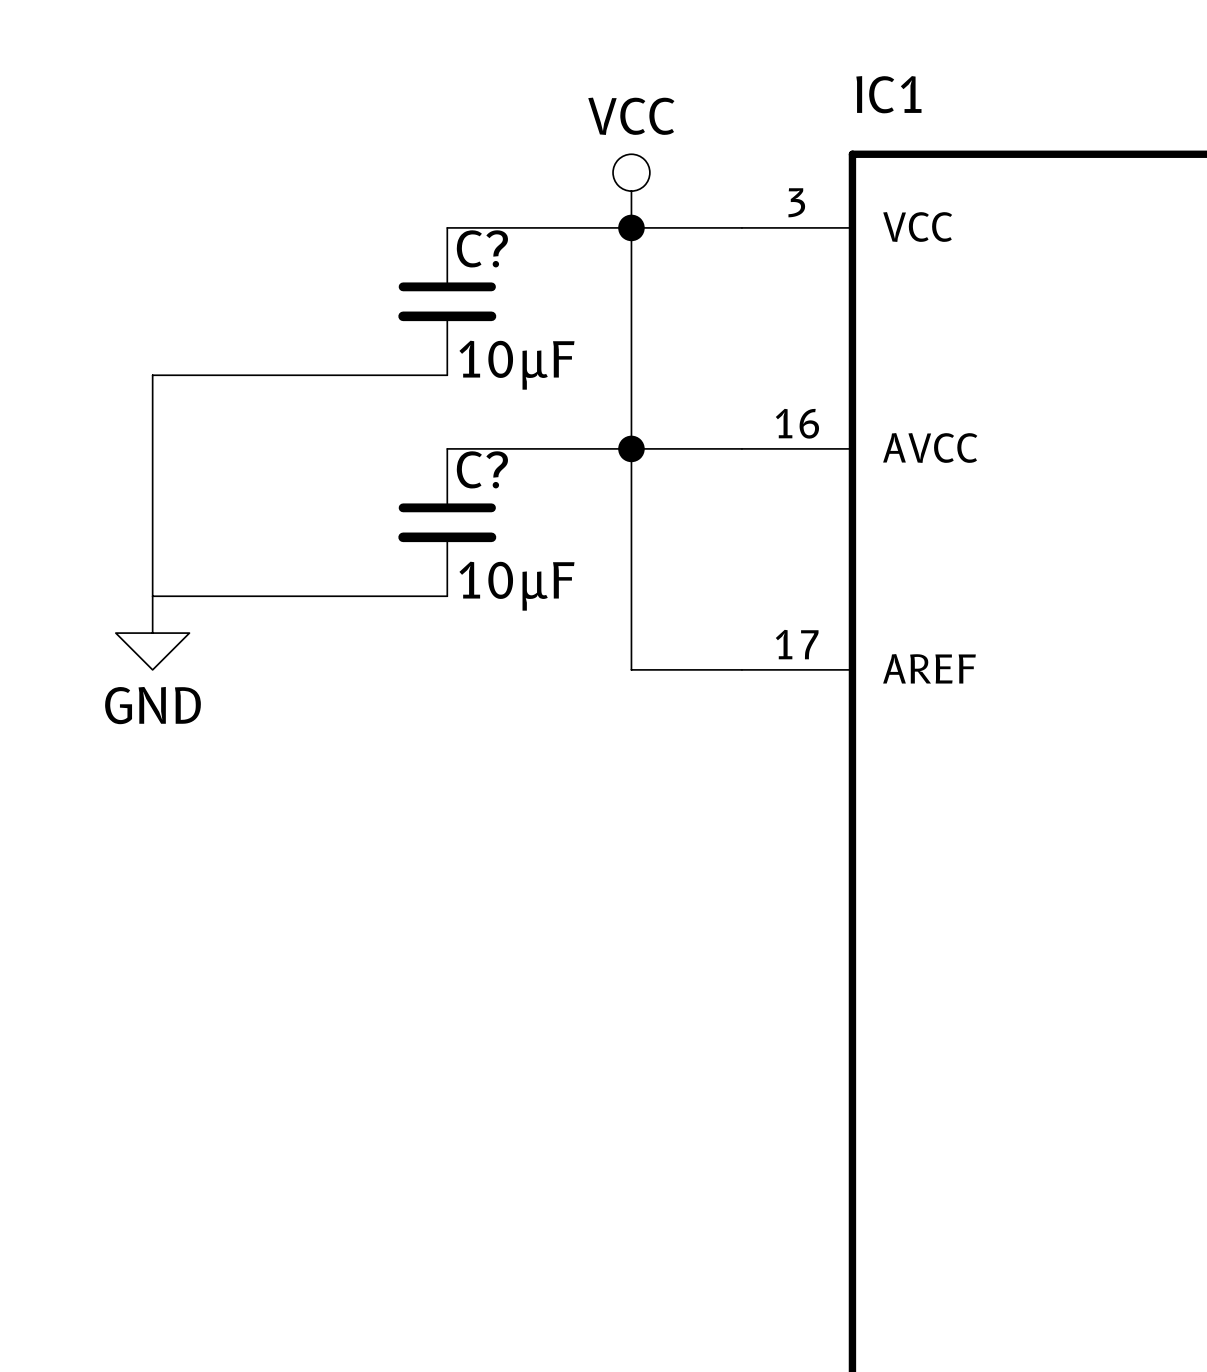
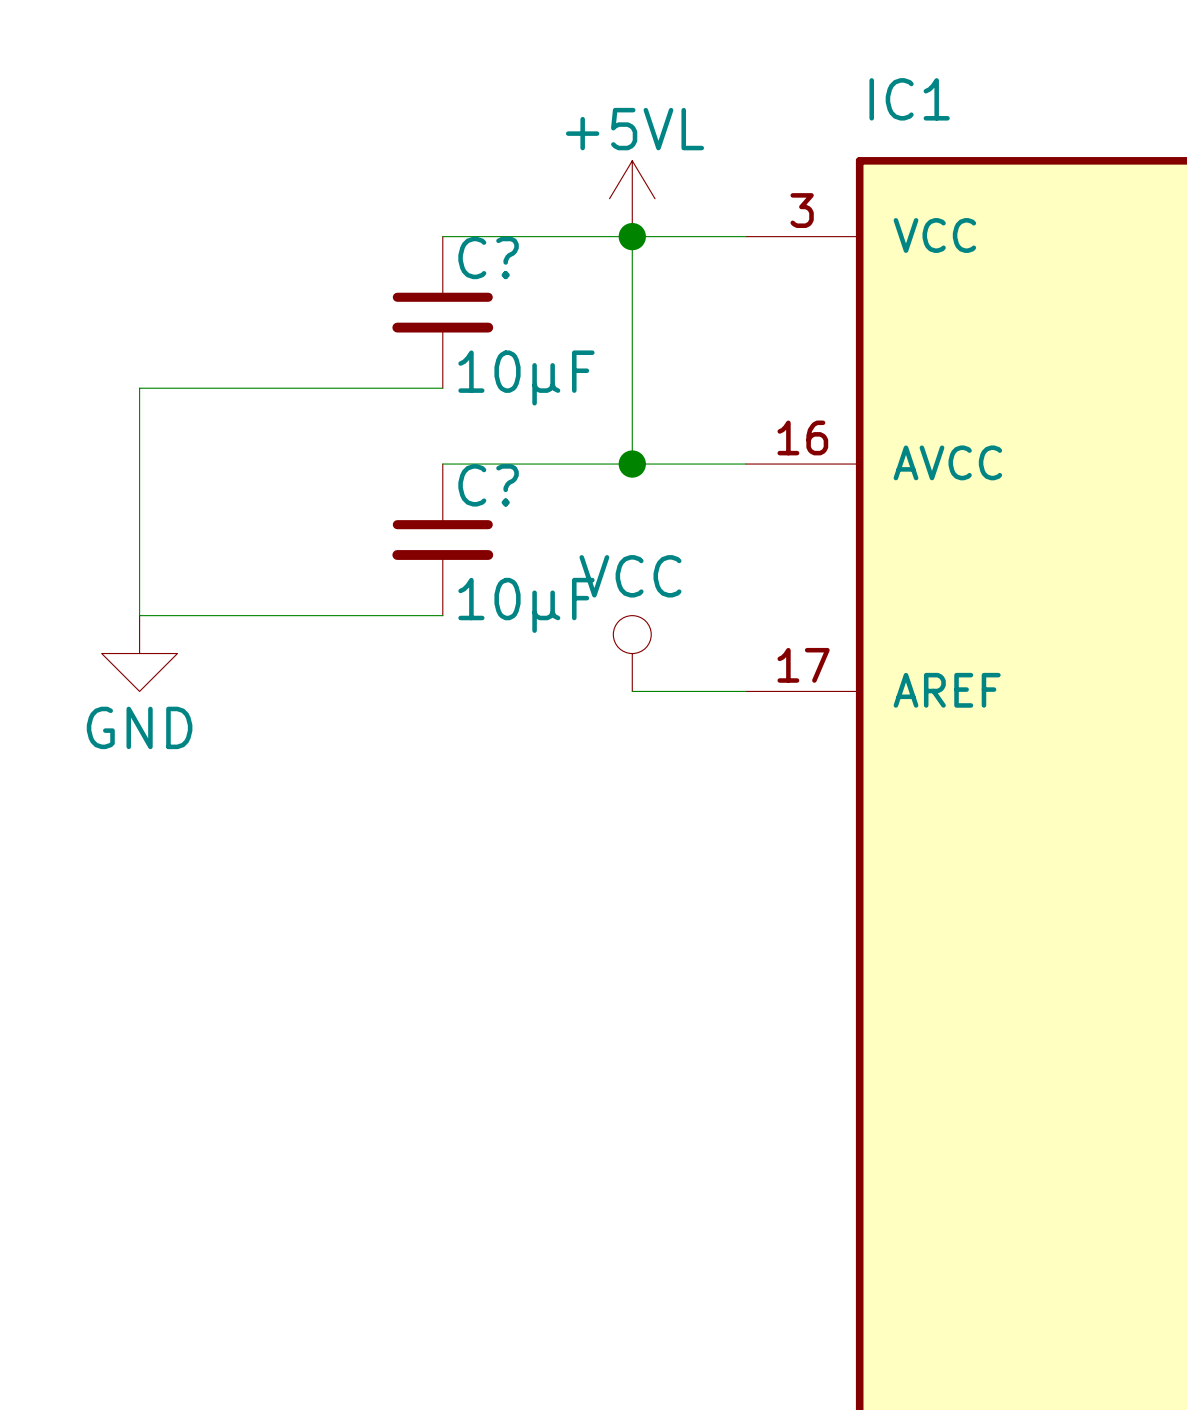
power symbol: VCC (631, 191) -> +5VL (632, 198)
wire: (631, 448) (631, 669) -> none
power symbol: none -> VCC (632, 653)

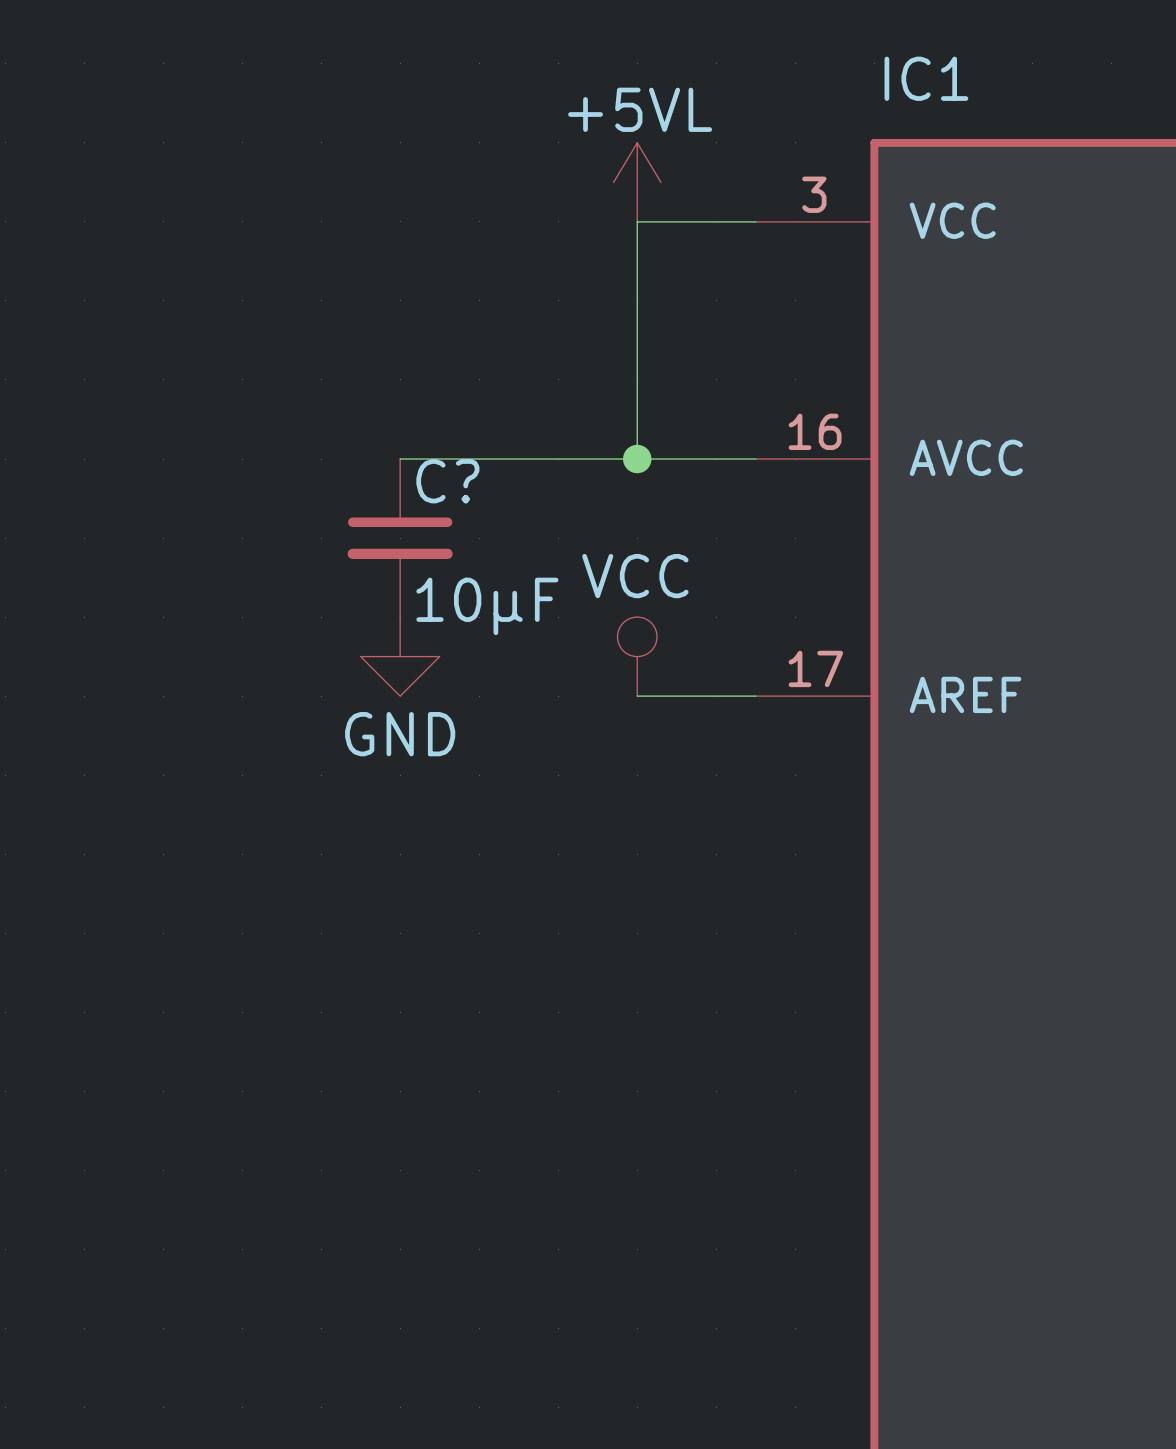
wire: (442, 236) (632, 236) -> none
junction: (632, 236) -> none
C?: 10µF (442, 312) -> none
wire: (442, 388) (139, 388) (139, 615) (442, 615) -> none
wire: none -> (400, 459) (439, 459)
C? position: (442, 539) -> (400, 538)
power symbol position: GND (139, 653) -> GND (400, 656)

